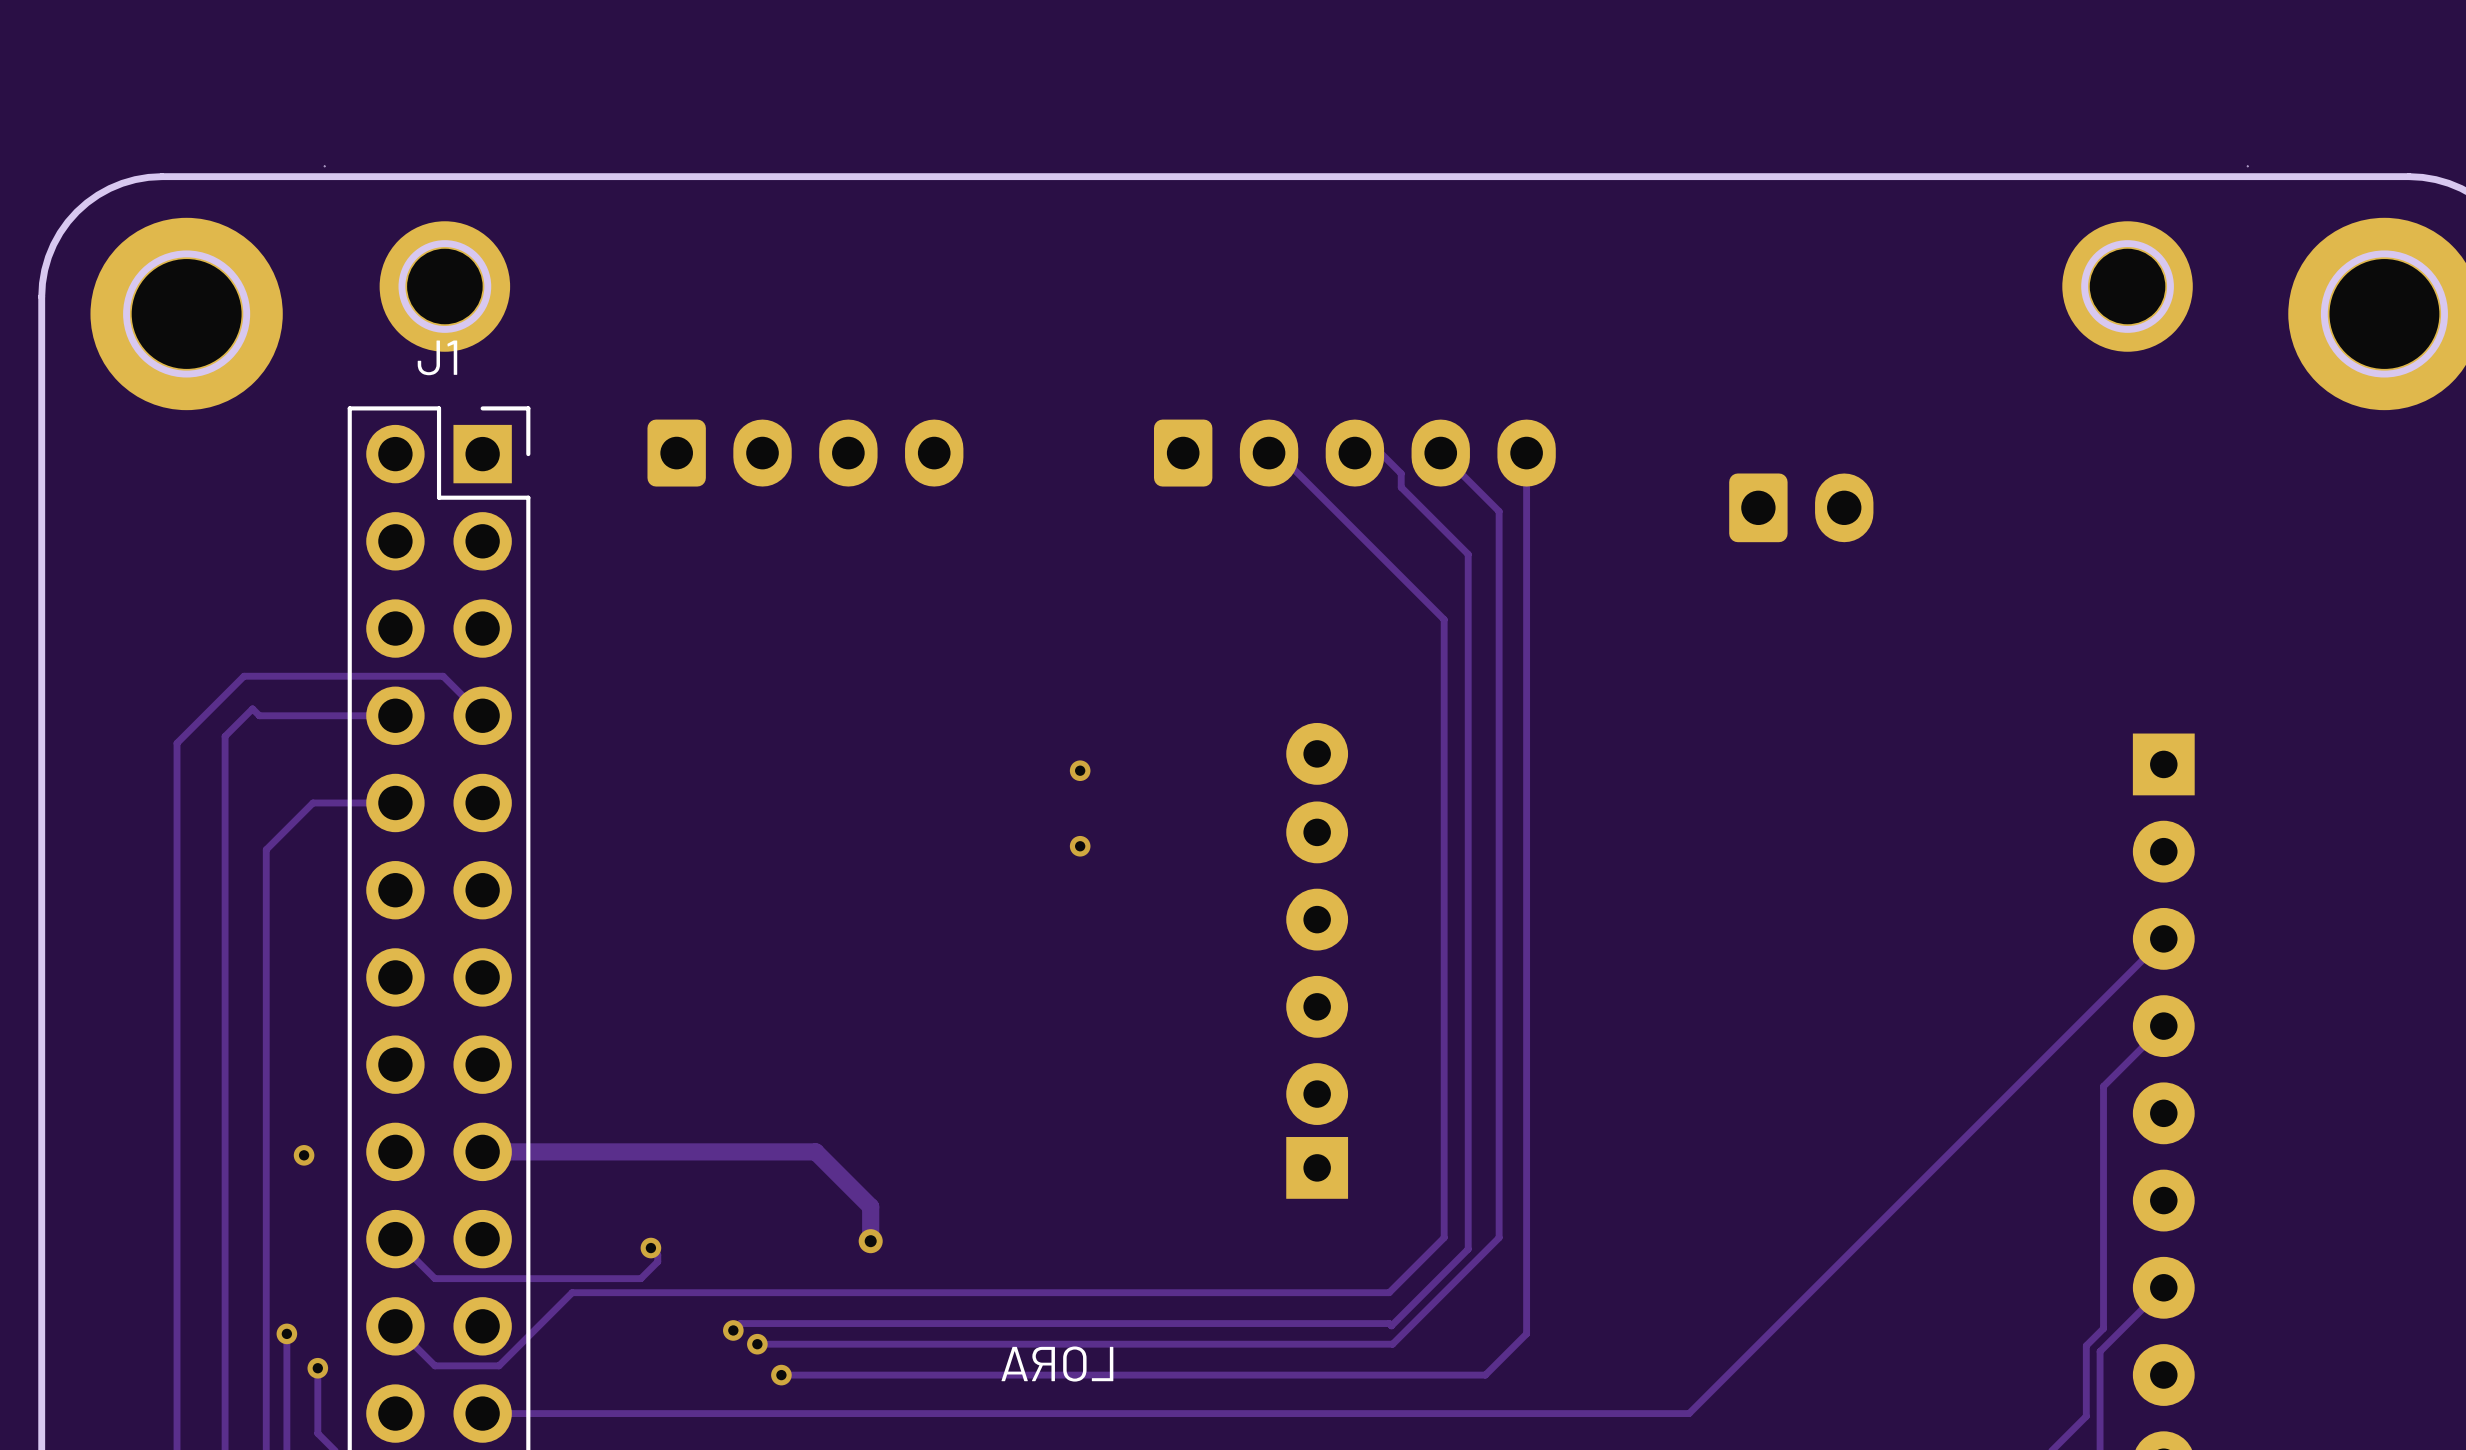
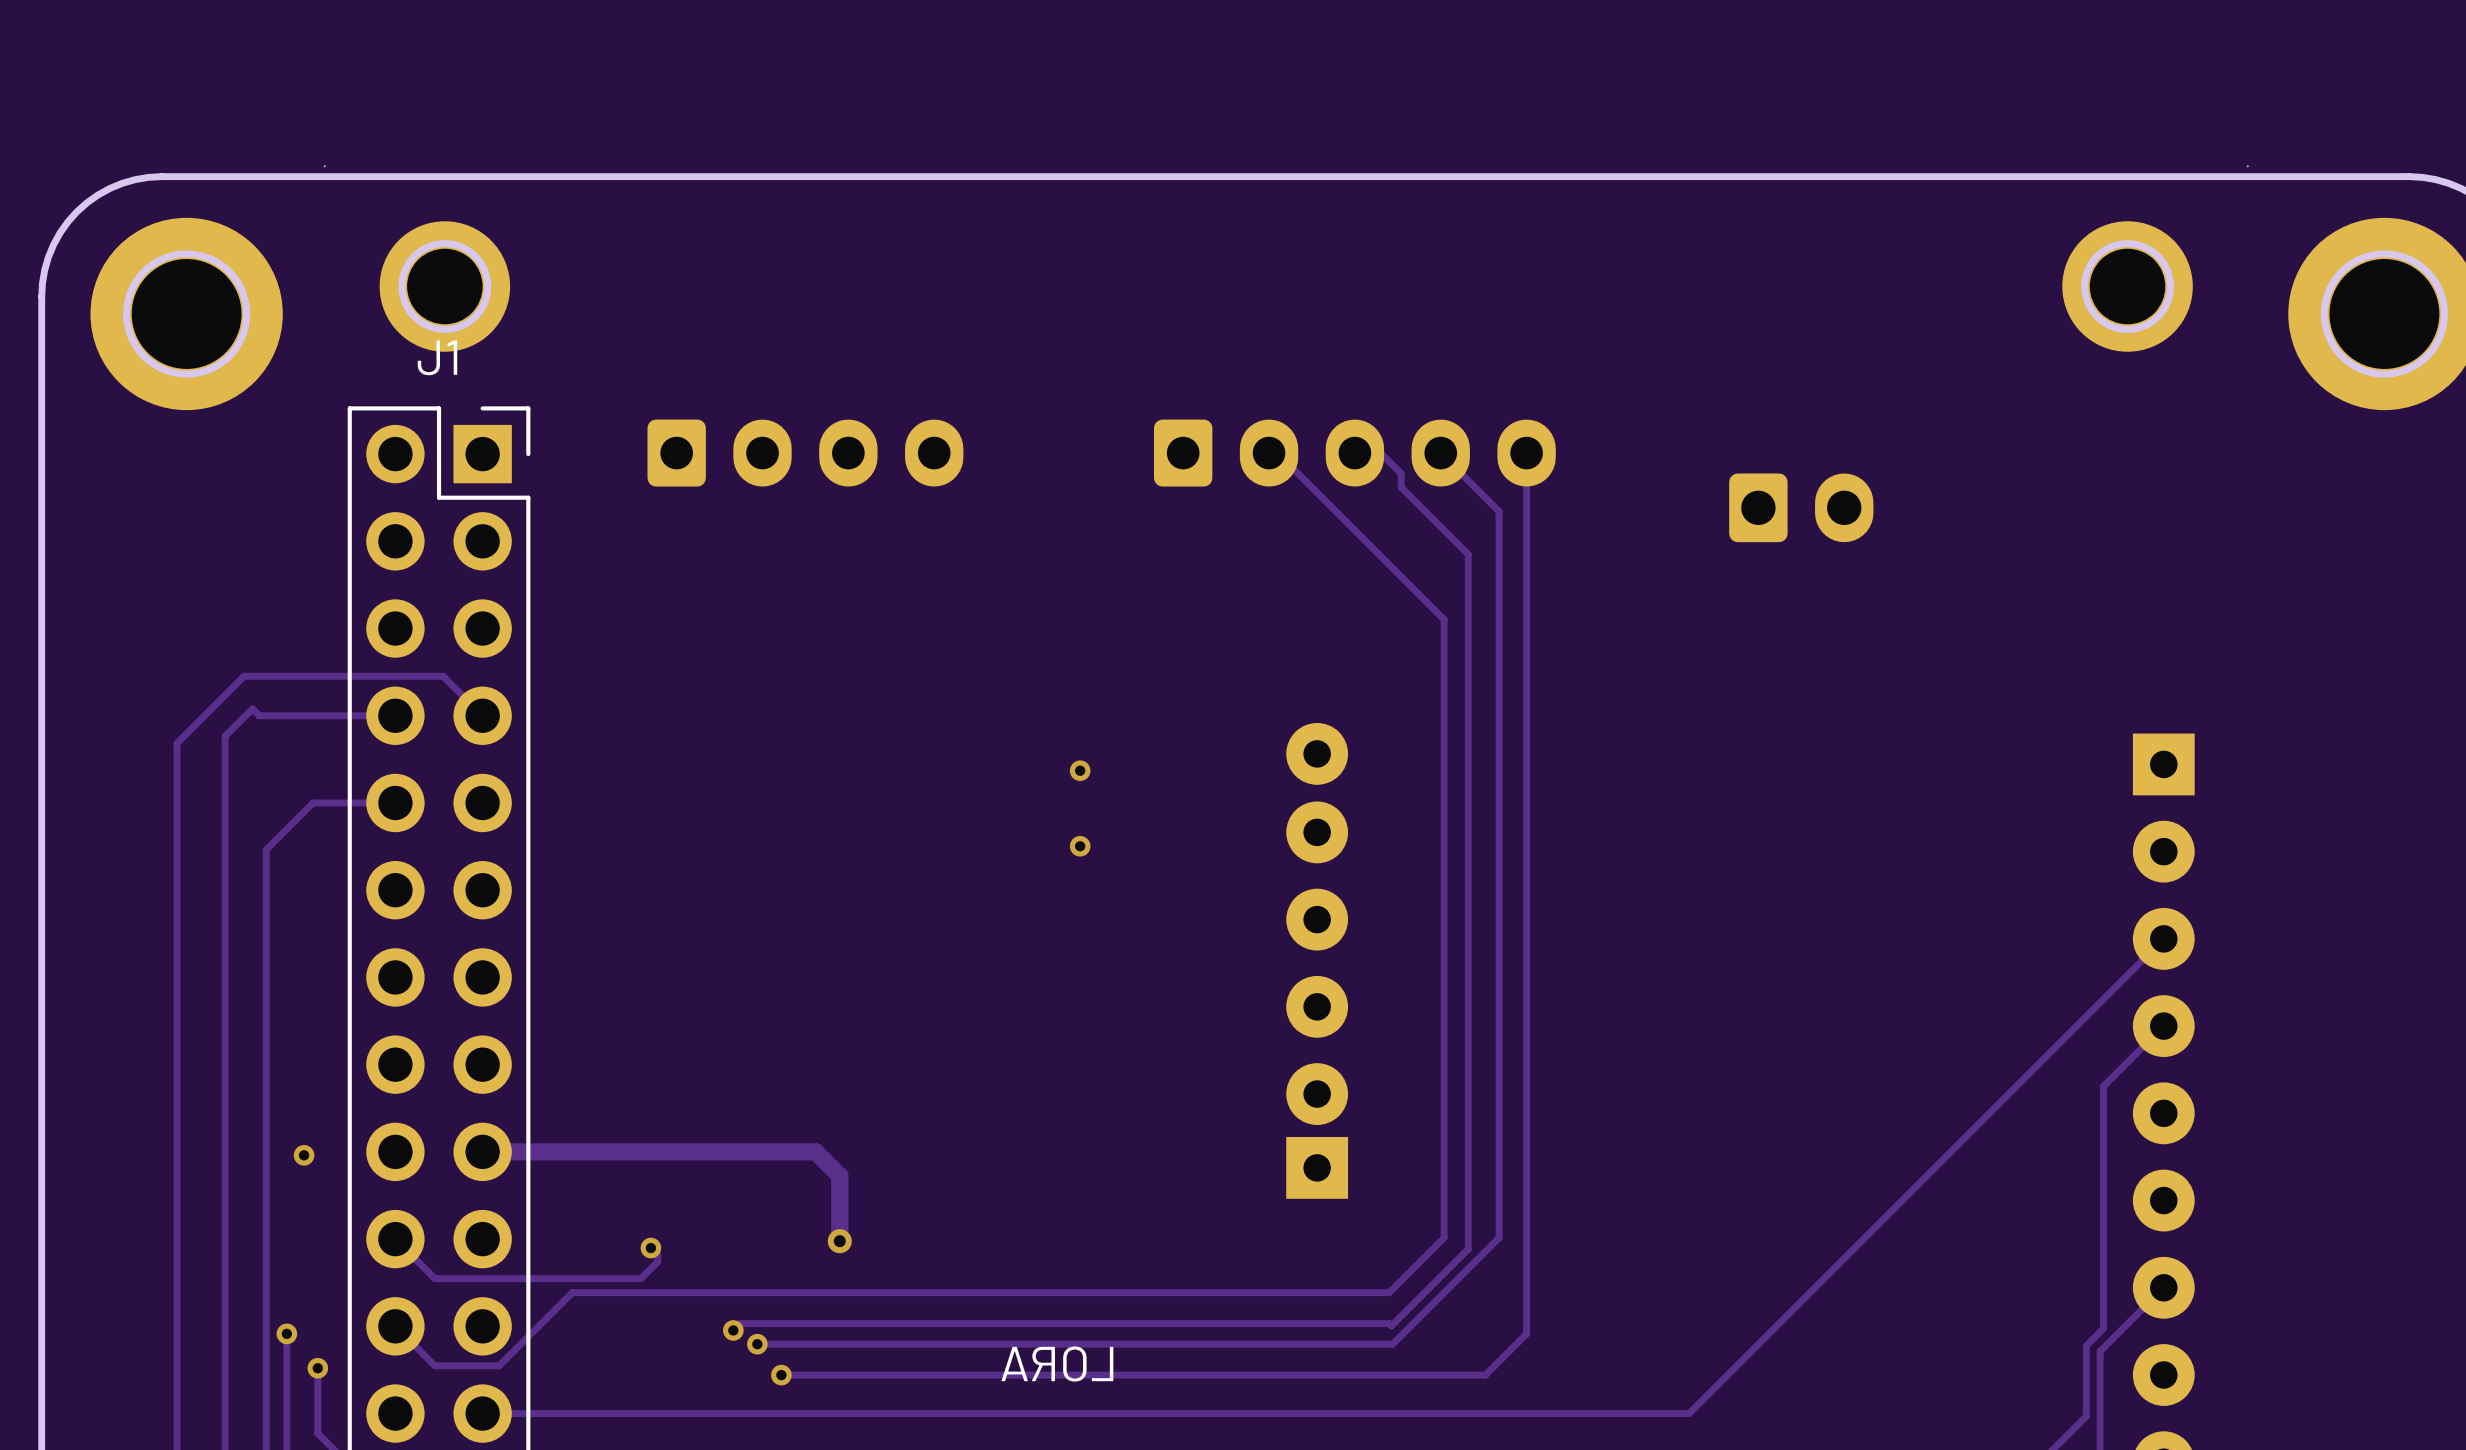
track: (839, 1175) (870, 1206) (870, 1241) -> (839, 1175) (839, 1241)
via position: (870, 1241) -> (839, 1241)

